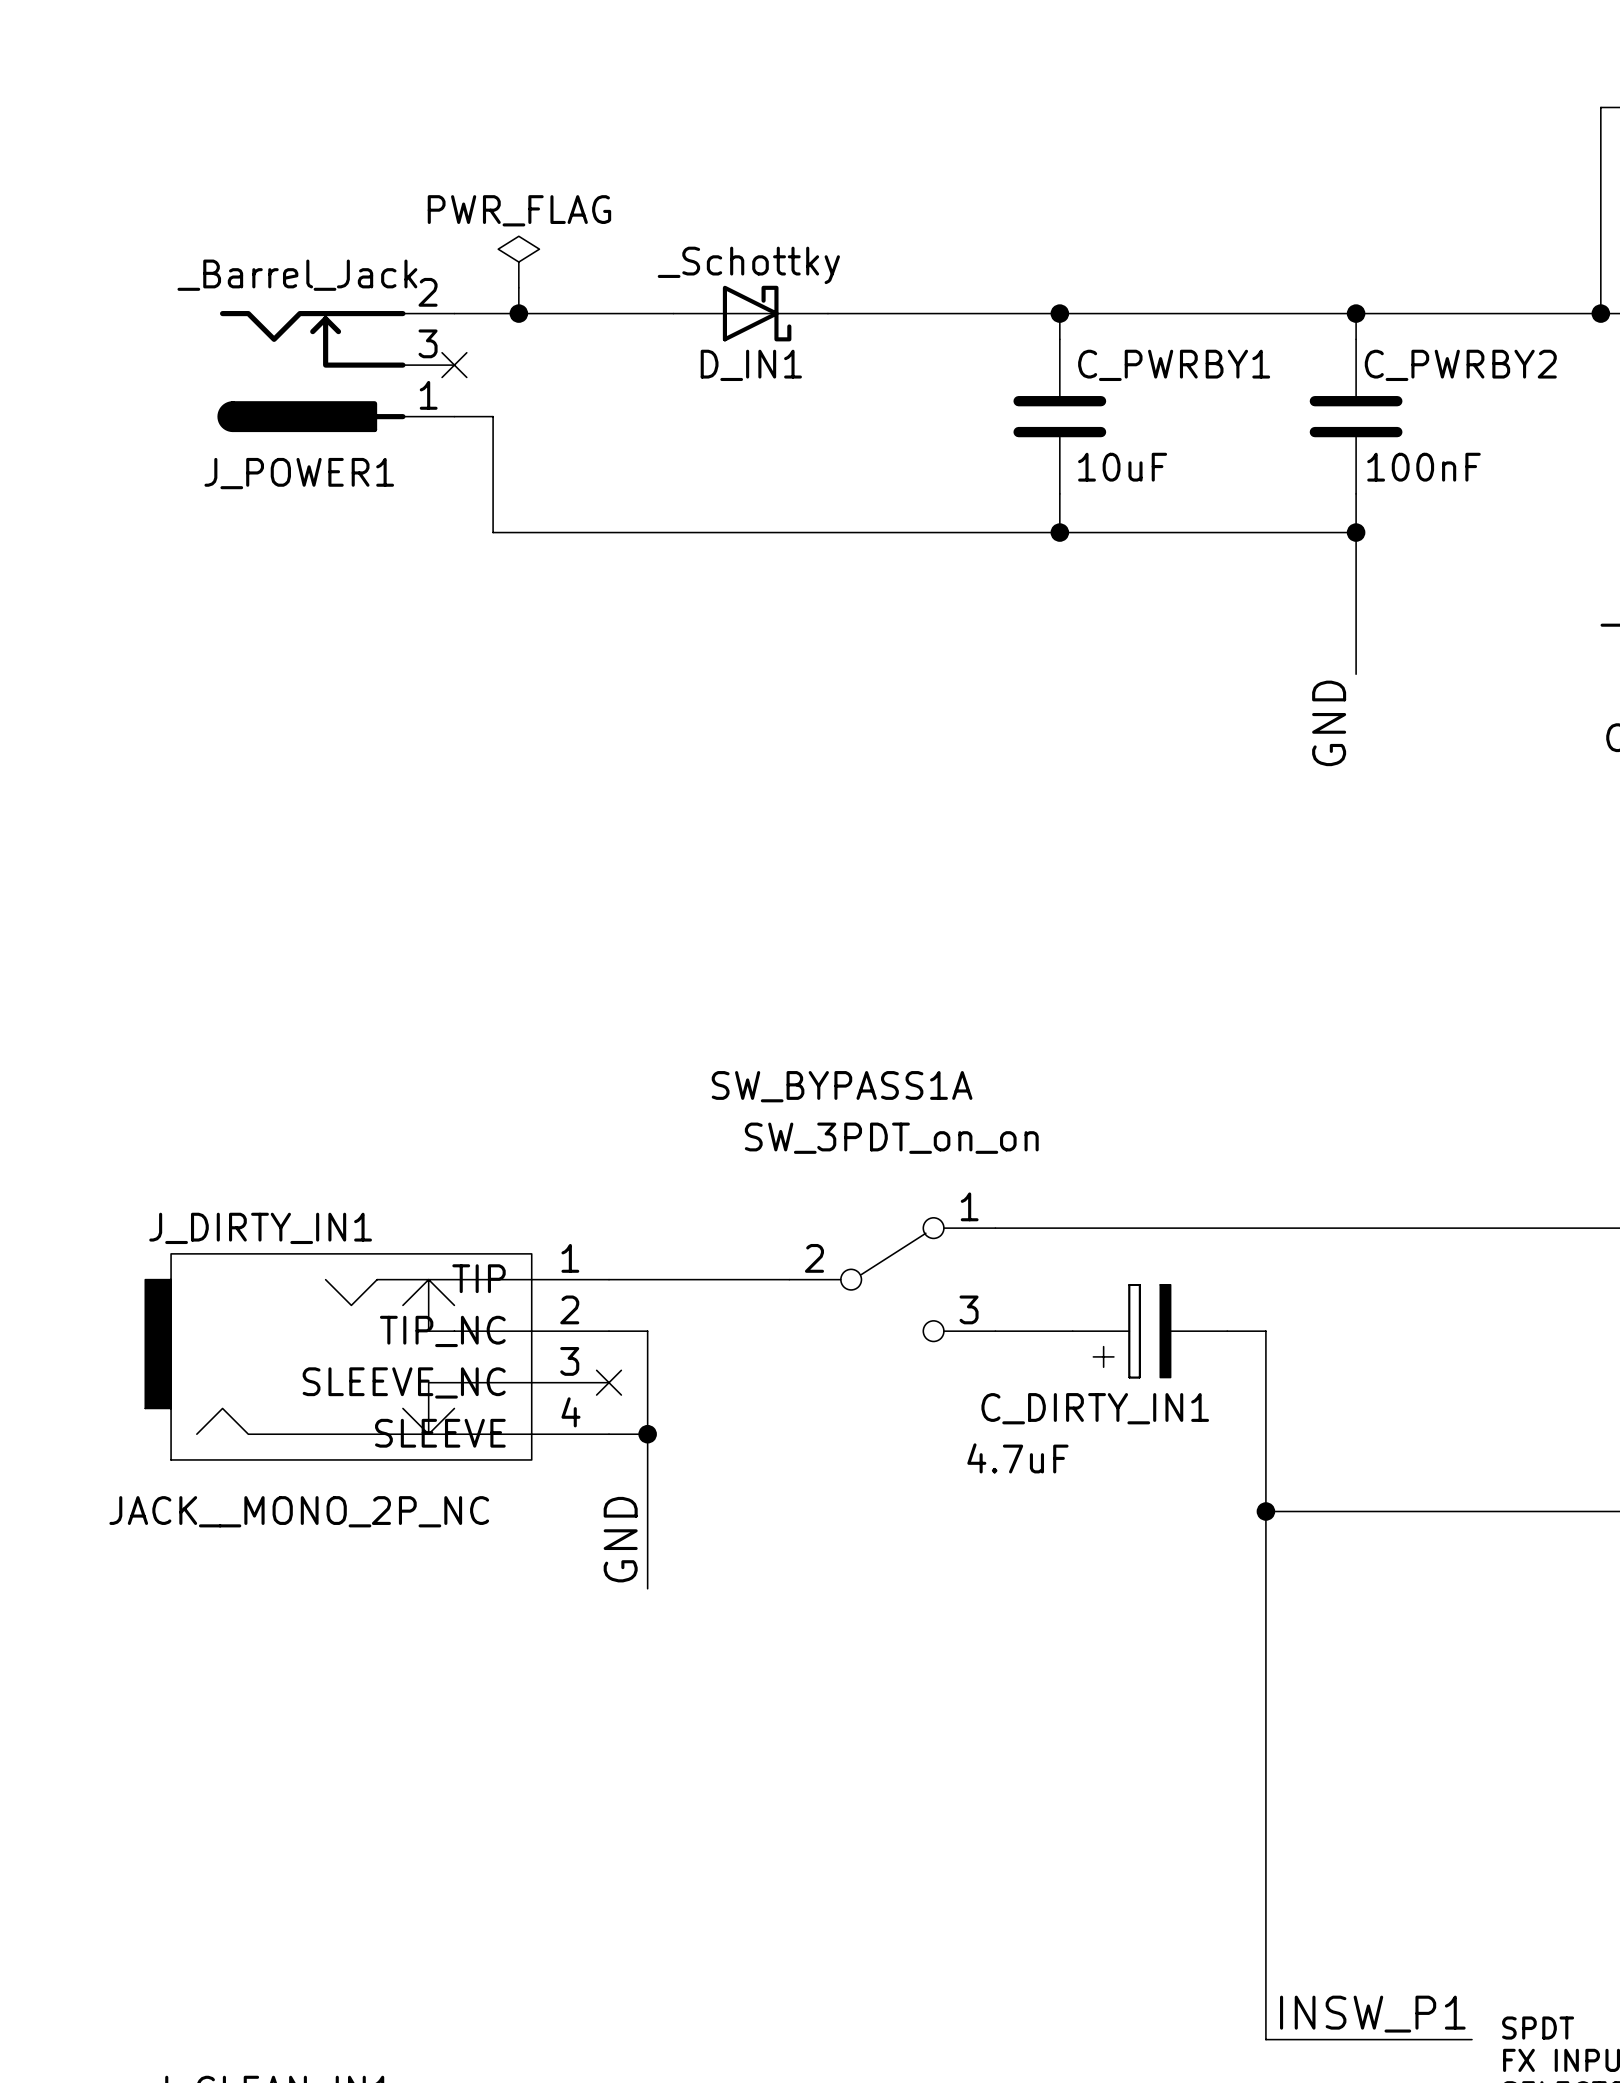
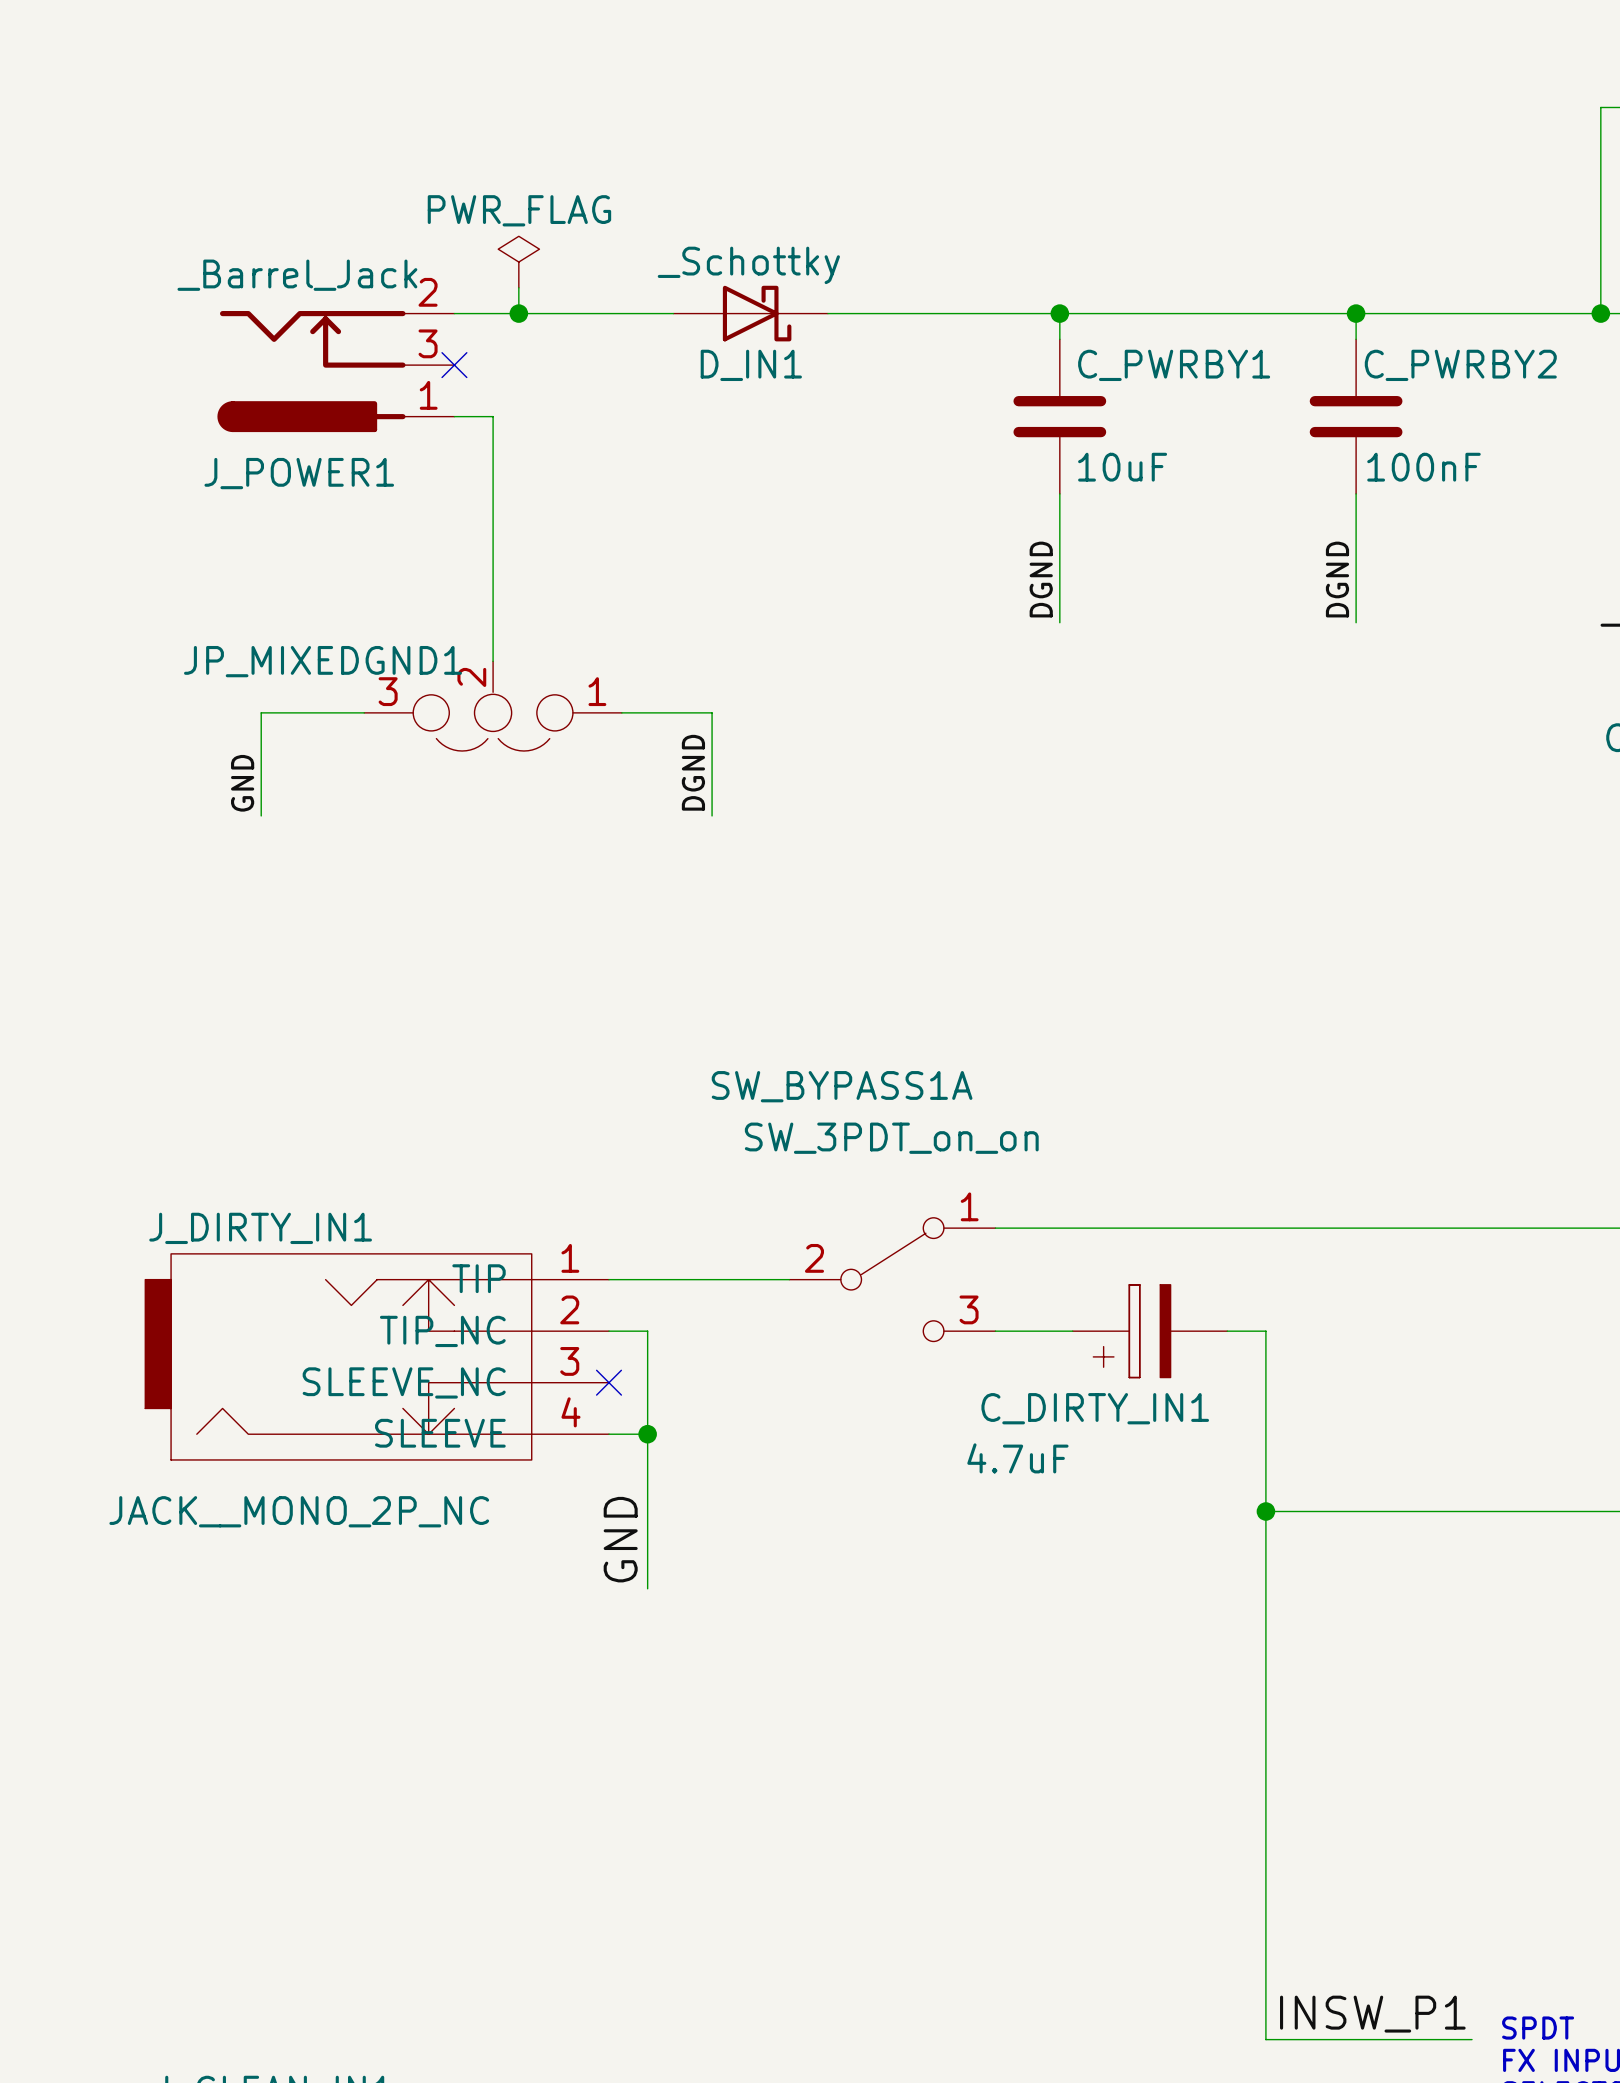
wire: (493, 532) (1356, 532) -> (493, 532) (493, 661)
wire: none -> (1059, 532) (1059, 622)
junction: (1059, 532) -> none
junction: (1356, 532) -> none
label: none -> DGND (1041, 579)
label: none -> DGND (1337, 579)
wire: (1356, 622) (1356, 674) -> none
JP_MIXEDGND1: none -> (493, 706)
wire: none -> (364, 712) (261, 712) (261, 815)
wire: none -> (621, 712) (712, 712) (712, 815)
label: GND (1329, 723) -> none
label: none -> DGND (693, 772)
label: none -> GND (242, 783)

